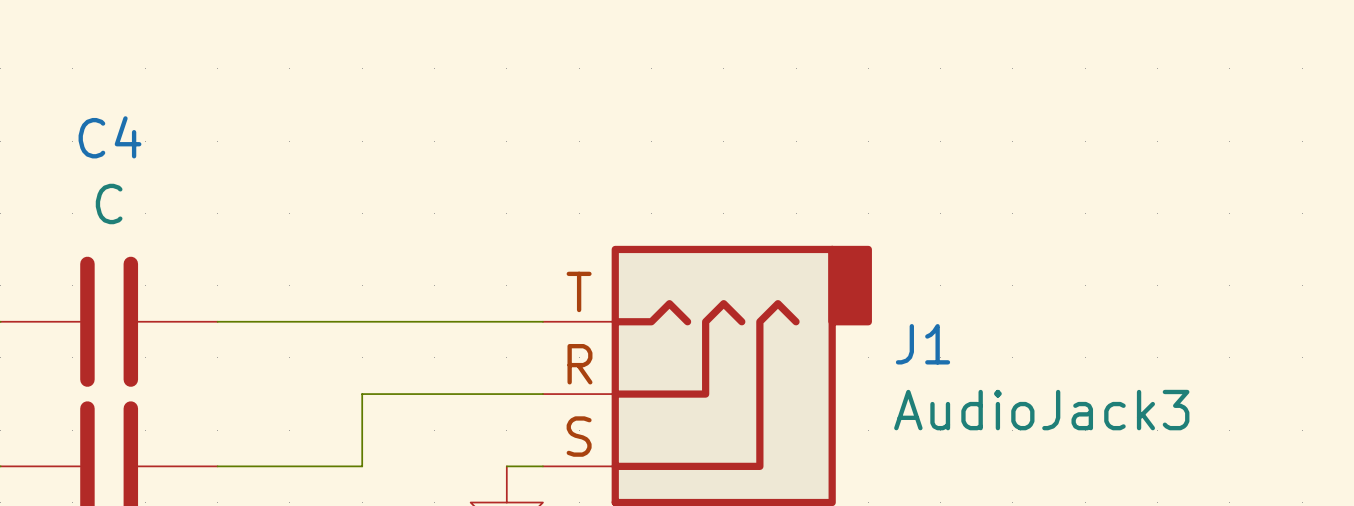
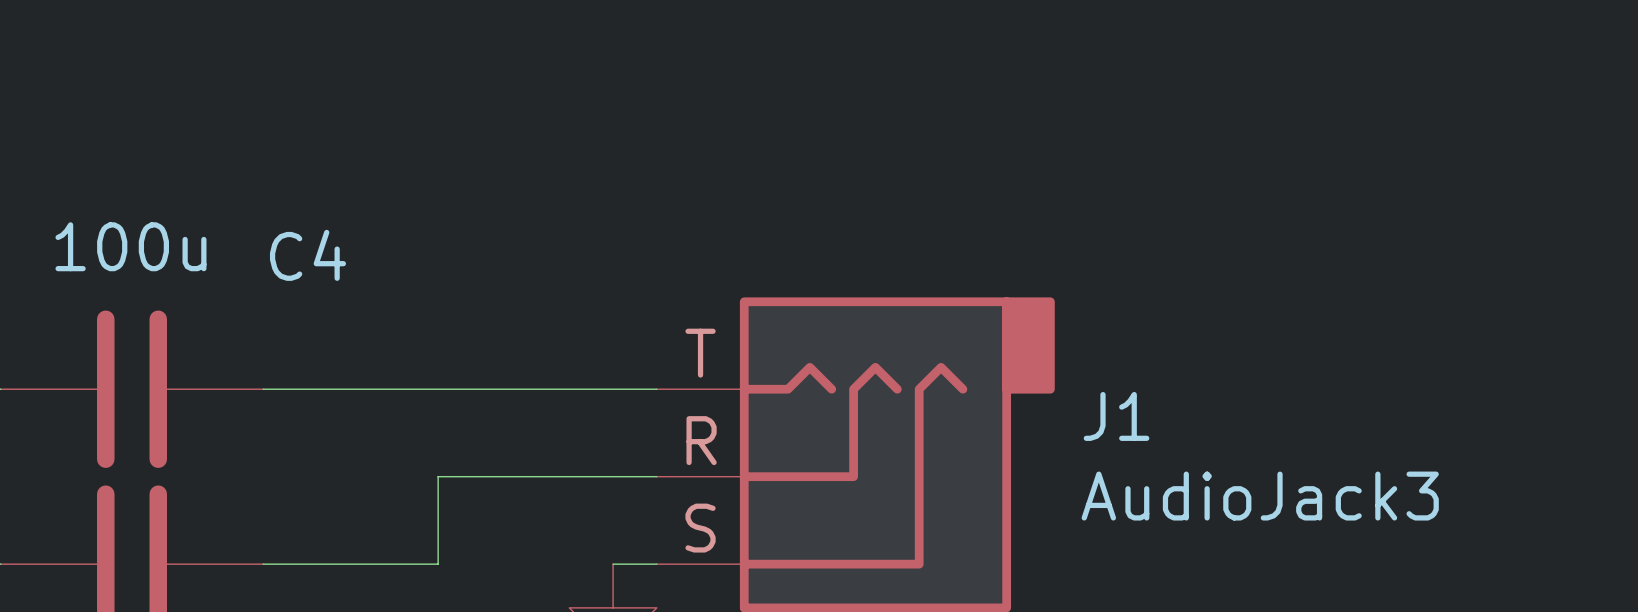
C4 name position: C4 (109, 137) -> C4 (307, 255)
C4 value: C (109, 204) -> 100u (130, 246)

